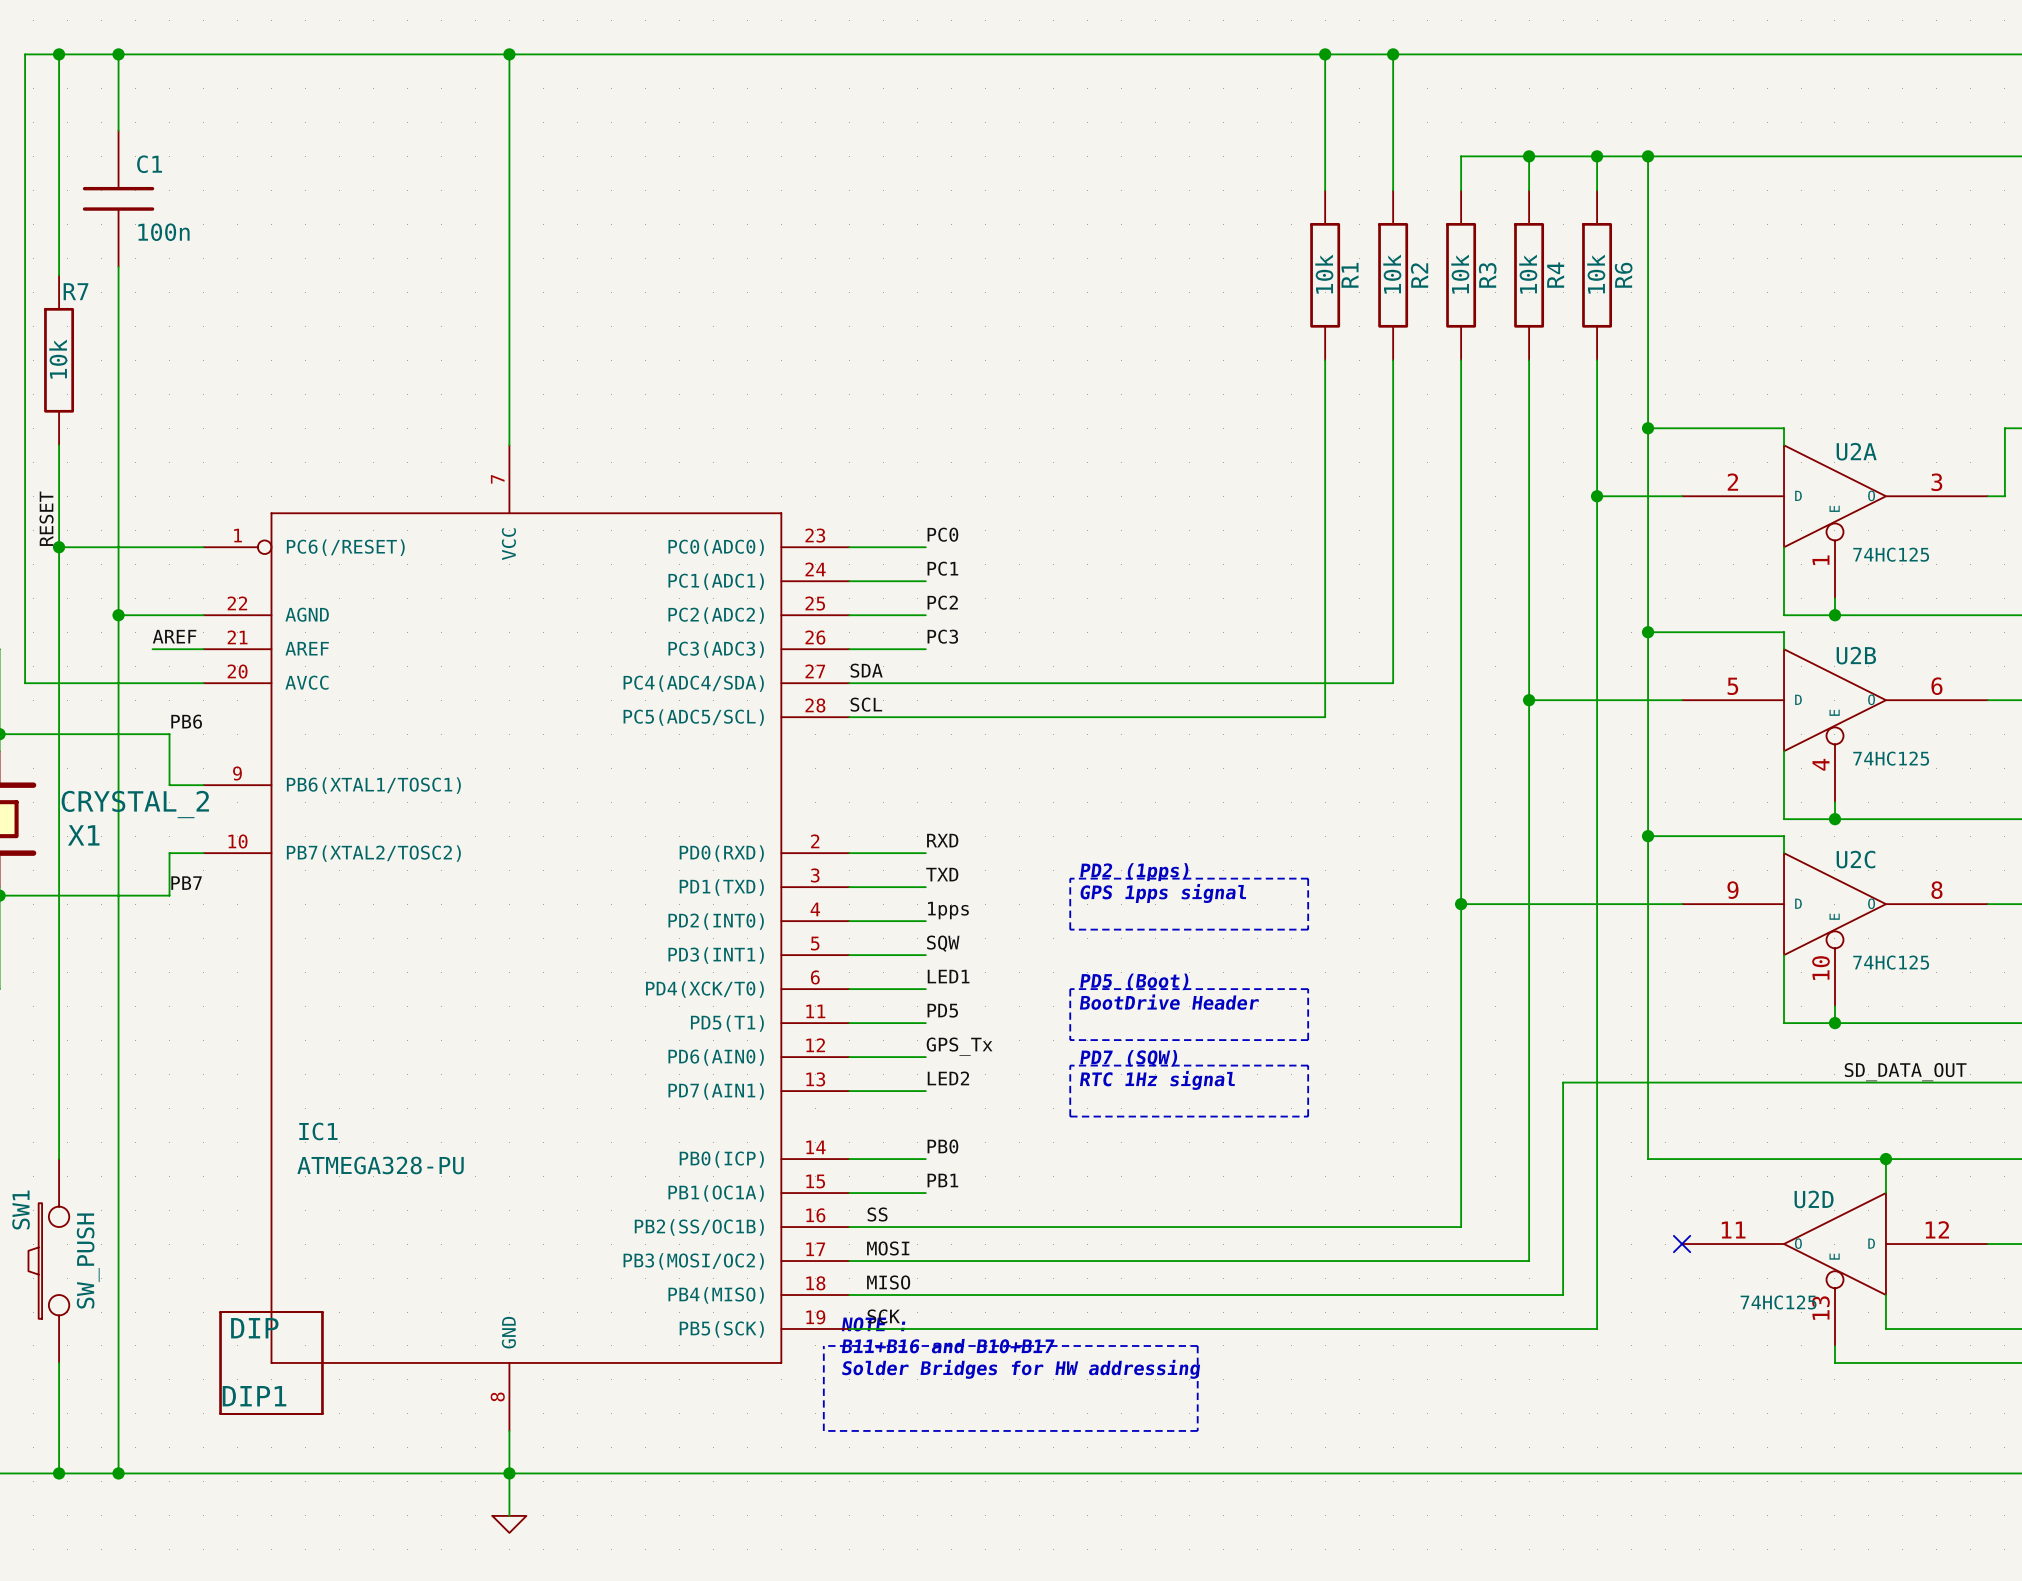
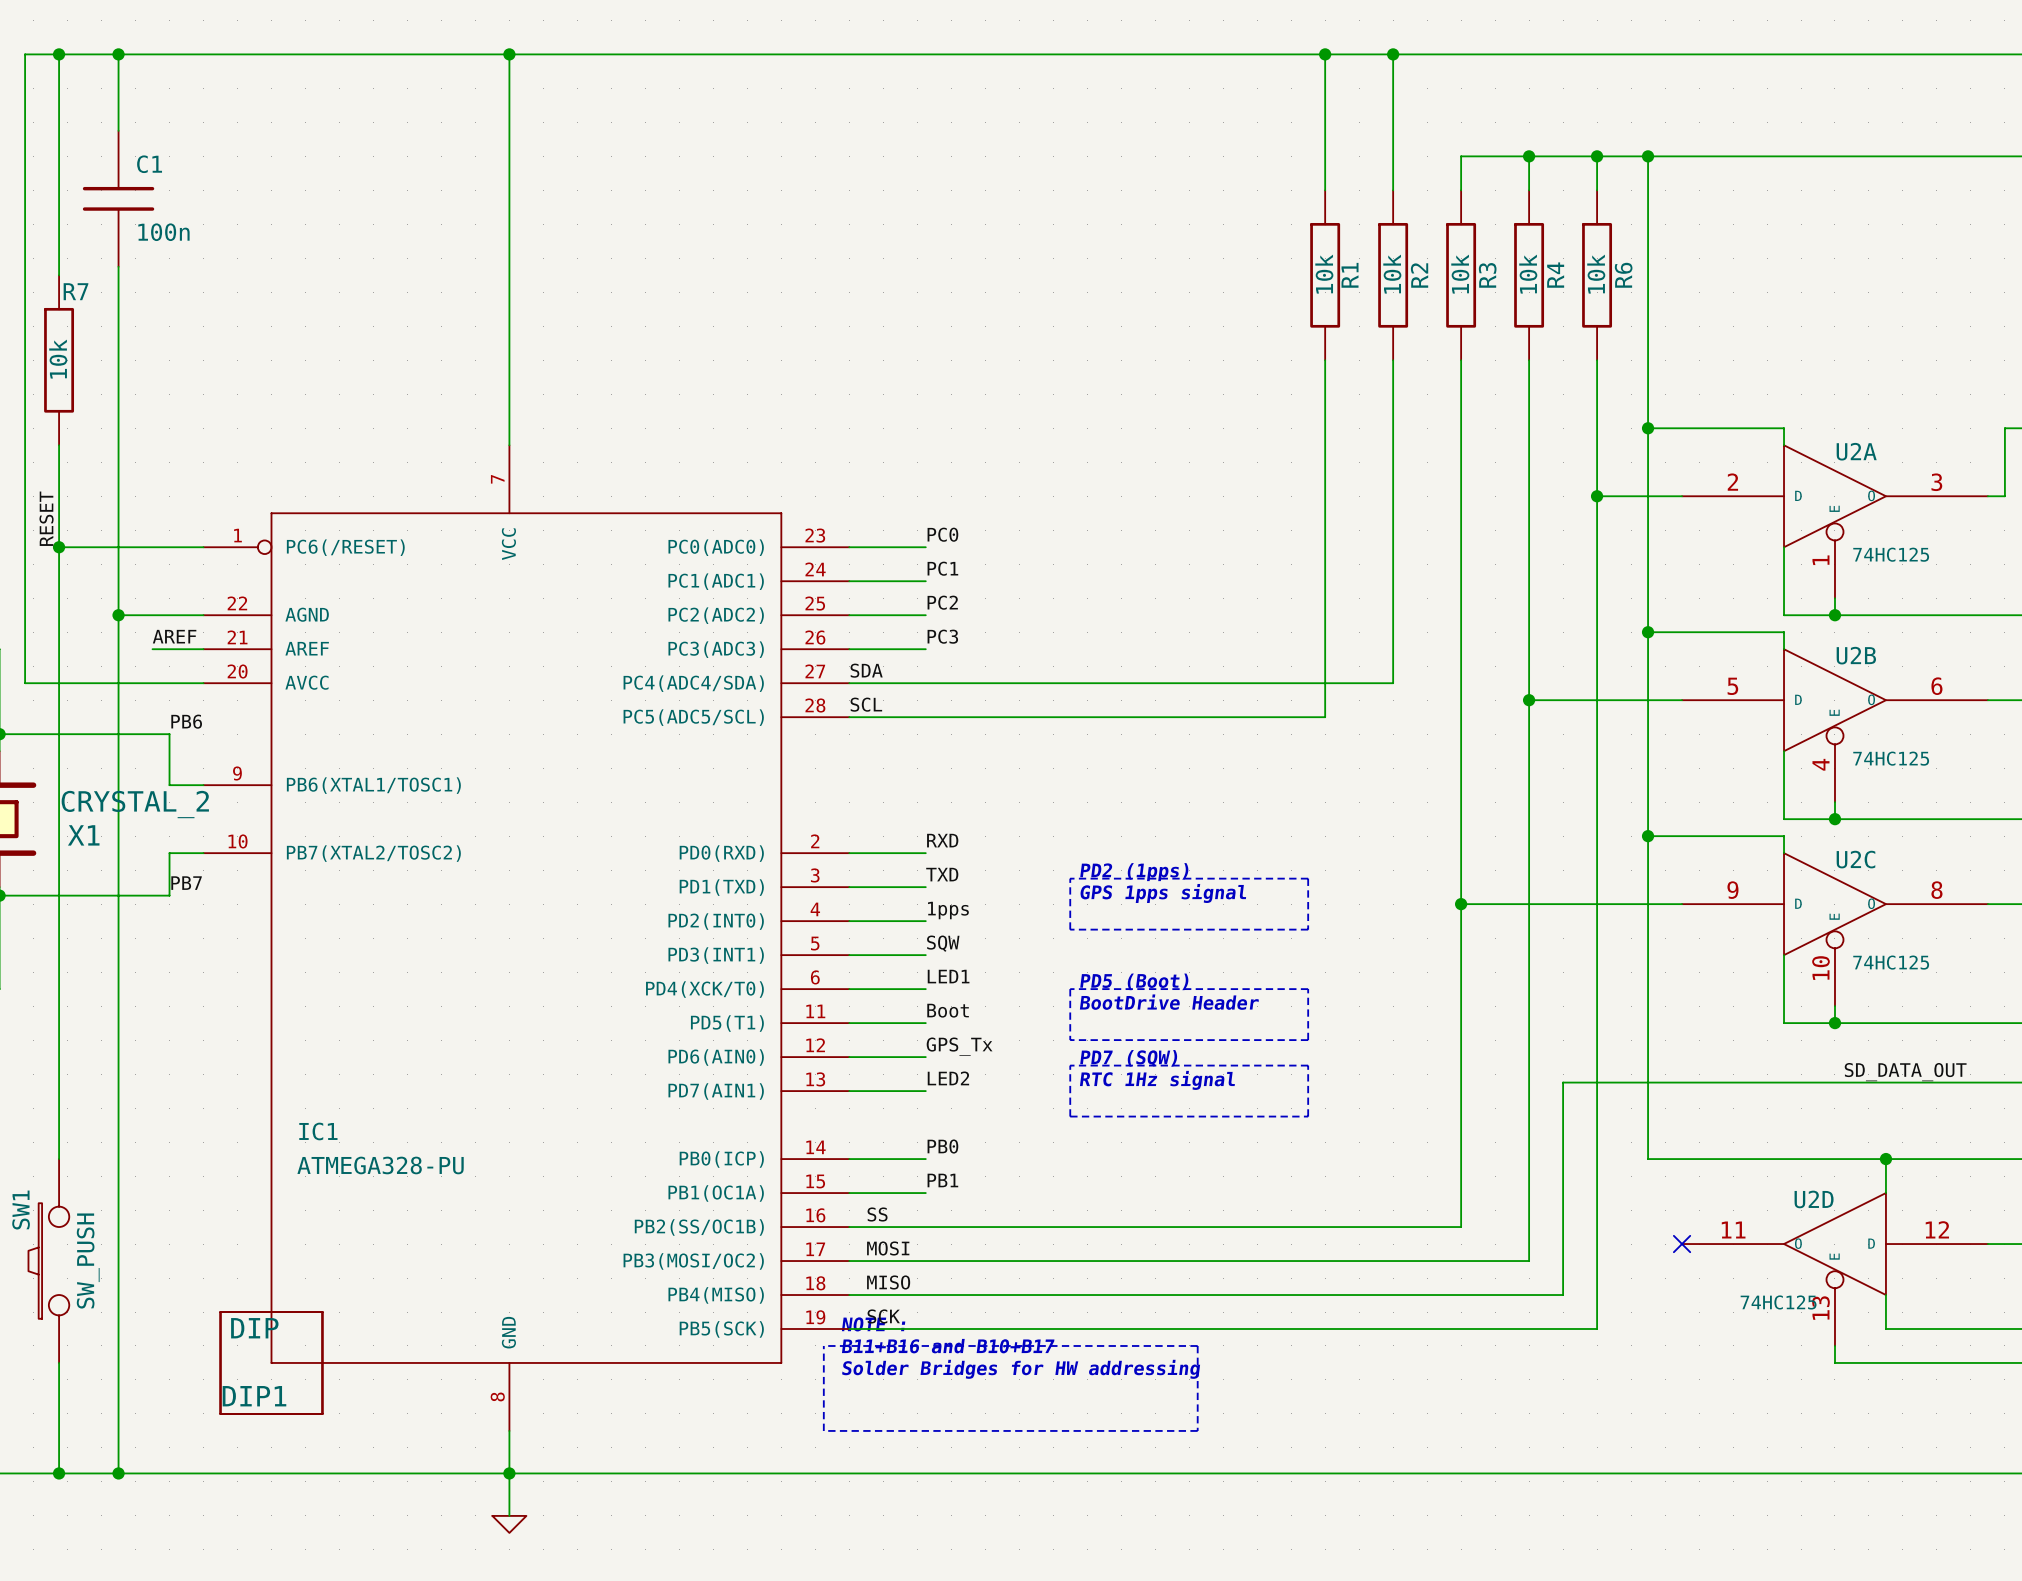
label: PD5 (942, 1010) -> Boot (948, 1010)

